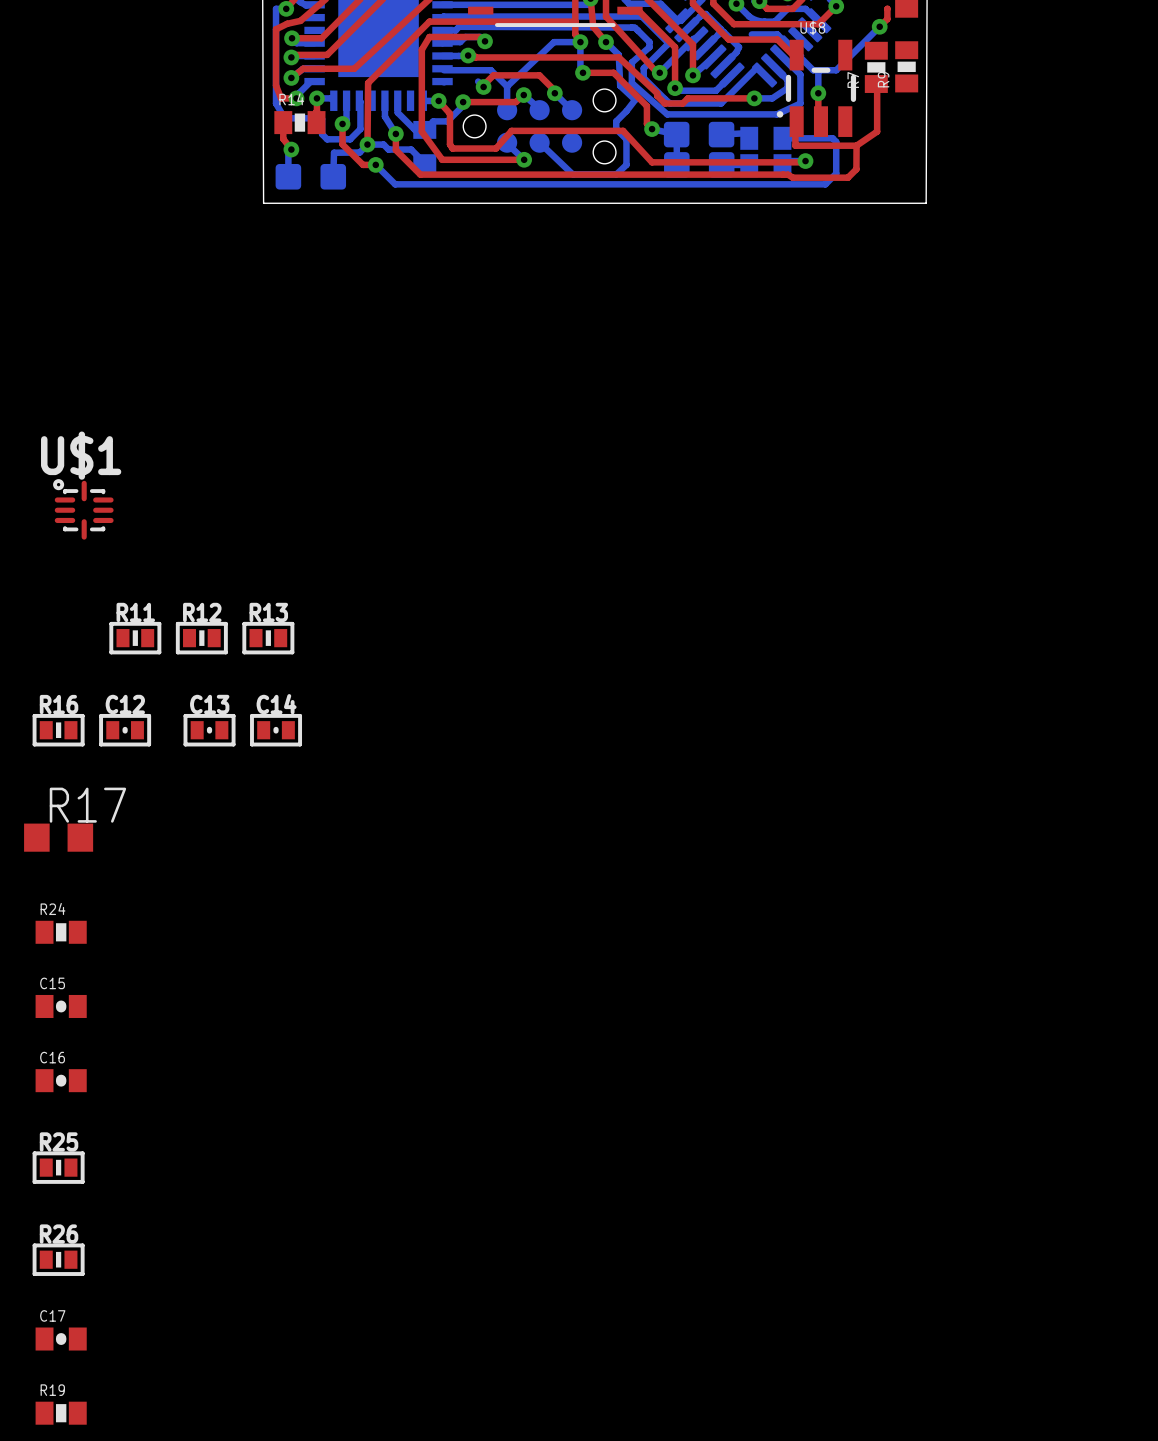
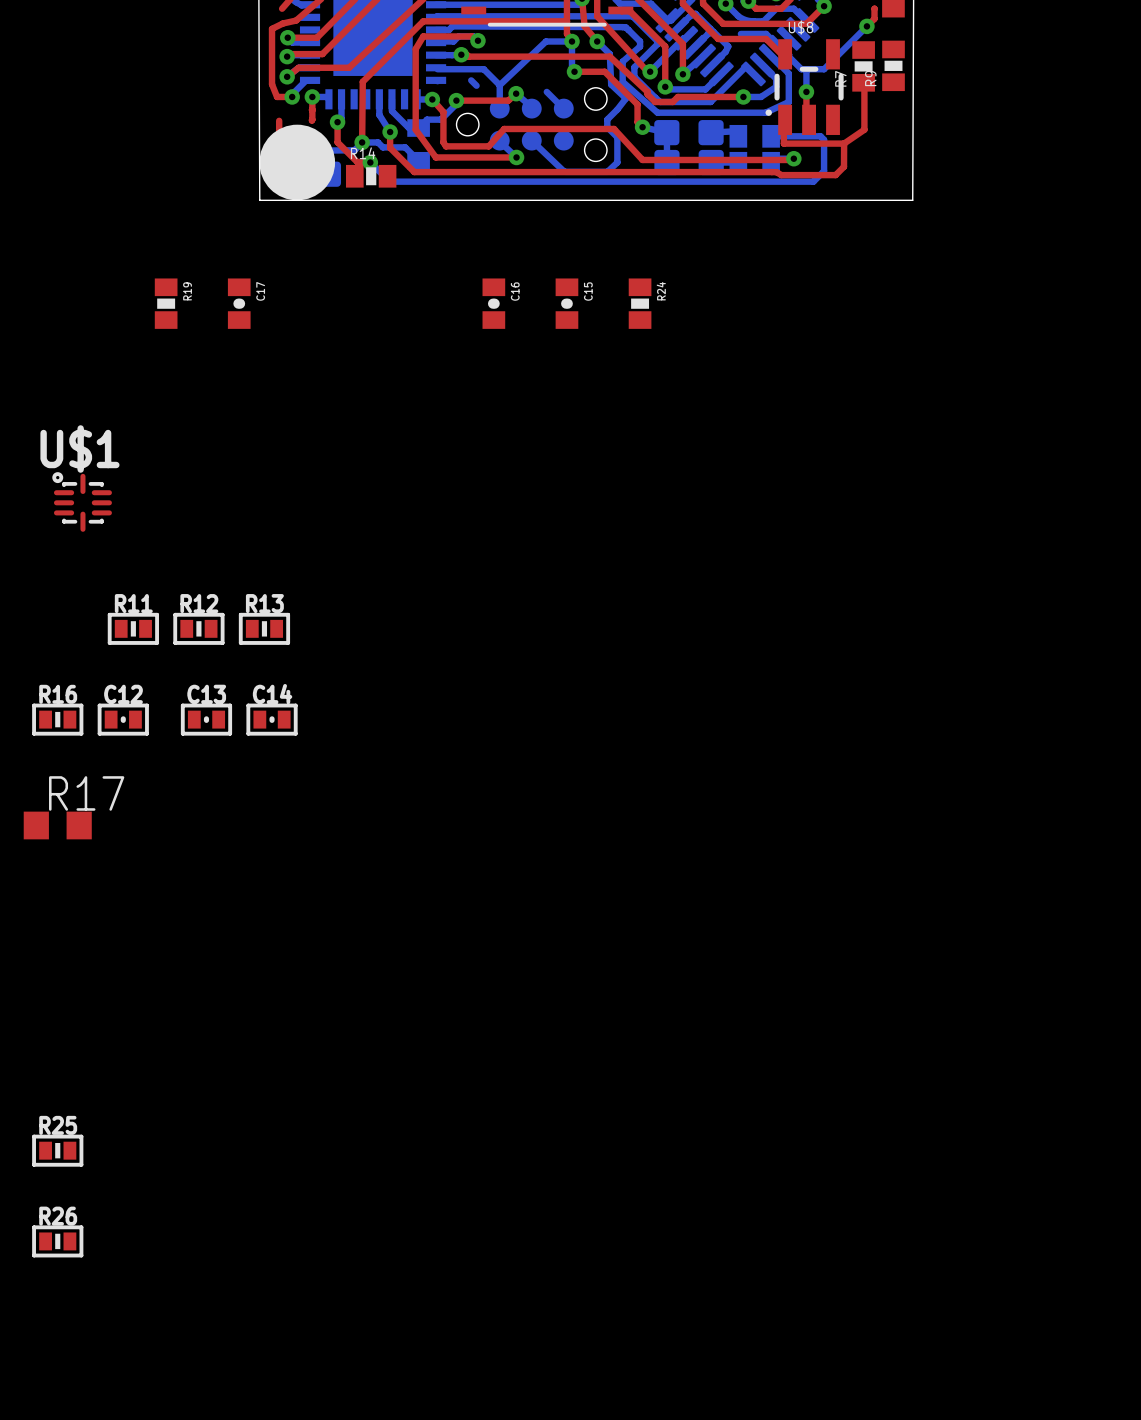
bottom track: (286, 8) (276, 8) (276, 103) (284, 118) (321, 118) (322, 134) (327, 139) (350, 139) (360, 129) (359, 100) -> none
via: (286, 8) -> none
top track: (483, 87) (493, 75) (539, 75) (554, 90) (554, 93) -> none
via: (483, 87) -> none
via: (554, 93) -> none
R14 position: (299, 122) -> (371, 176)
drawing: none -> [259, 124, 336, 201]
R24 rotation: 0° (61, 932) -> 90° clockwise (640, 303)
R24 position: (61, 932) -> (640, 303)
C15 rotation: 0° (61, 1006) -> 90° clockwise (566, 303)
C15 position: (61, 1006) -> (566, 303)
C16 rotation: 0° (61, 1080) -> 90° clockwise (493, 303)
C16 position: (61, 1080) -> (493, 303)
C17 rotation: 0° (61, 1339) -> 90° clockwise (239, 303)
C17 position: (61, 1339) -> (239, 303)
R19 rotation: 0° (61, 1413) -> 90° clockwise (166, 303)
R19 position: (61, 1413) -> (166, 303)

